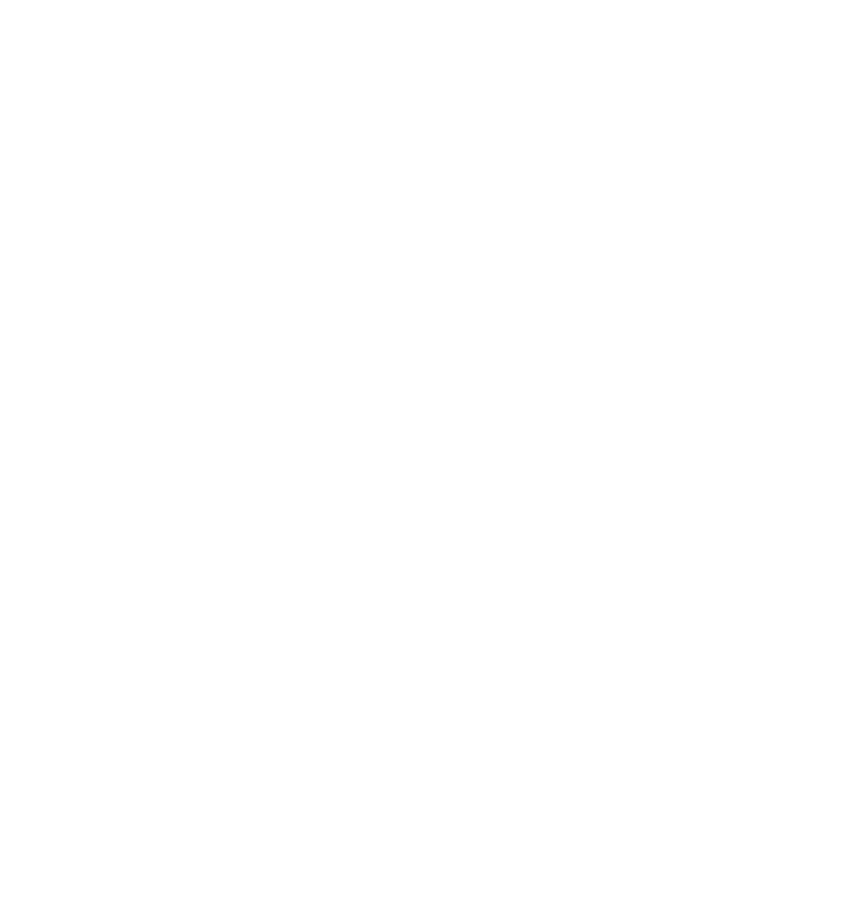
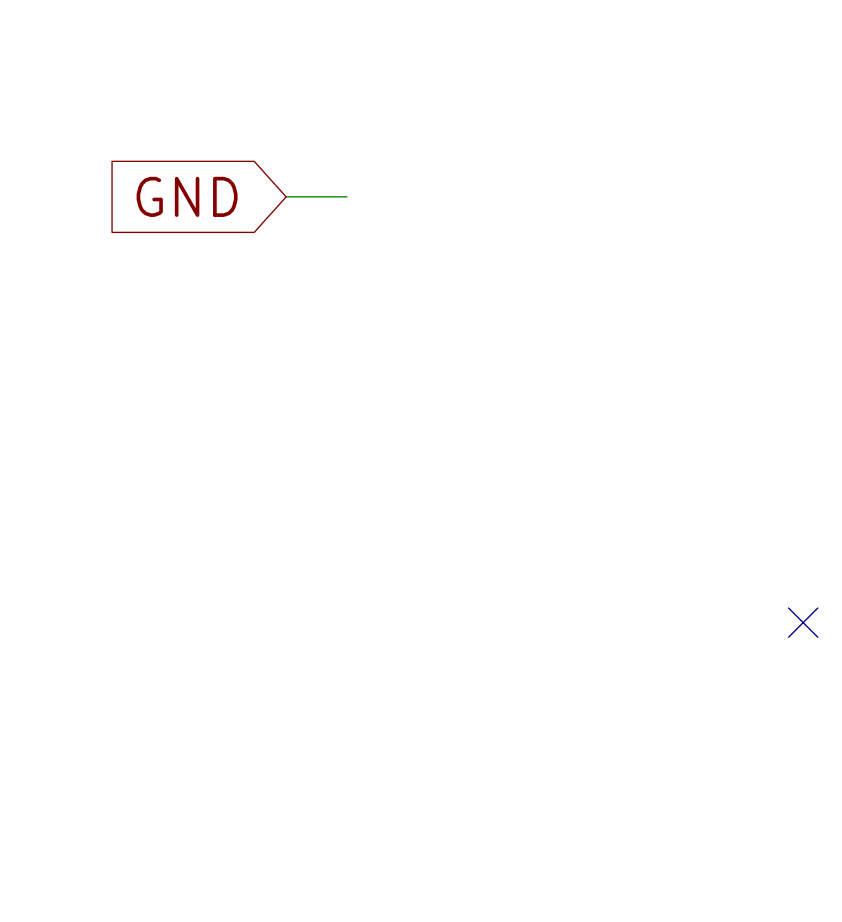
global label: none -> GND (187, 196)
wire: none -> (286, 196) (346, 196)
no-connect mark: none -> (803, 622)

